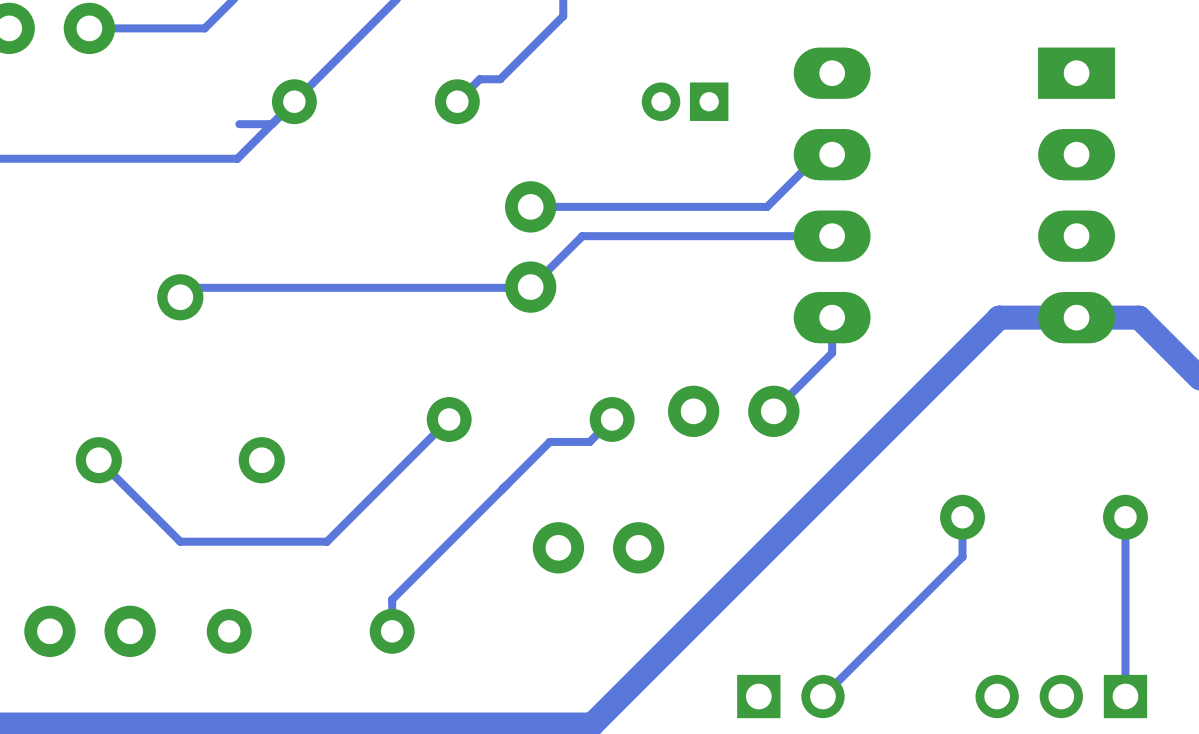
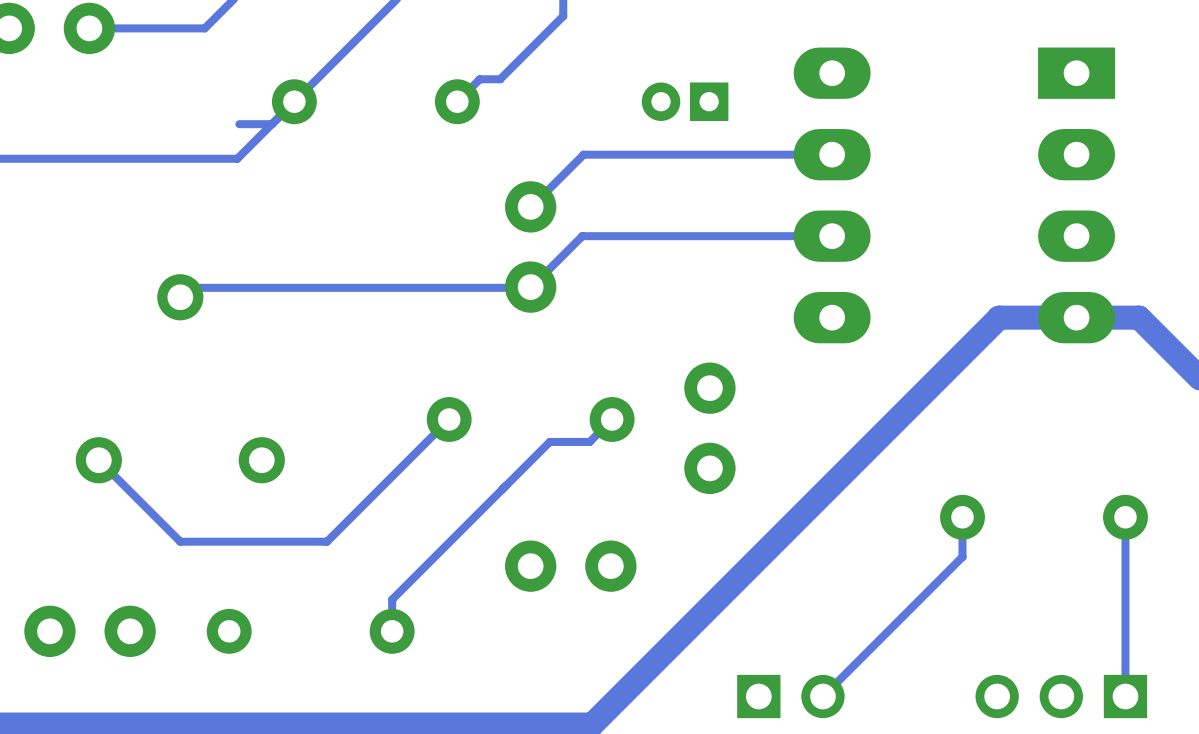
track: (819, 154) (767, 206) (530, 206) -> (819, 154) (583, 154) (530, 207)
track: (832, 317) (832, 353) (773, 411) -> none
part rotation: 0° (733, 411) -> 90° clockwise (709, 428)
part position: (598, 547) -> (570, 566)

